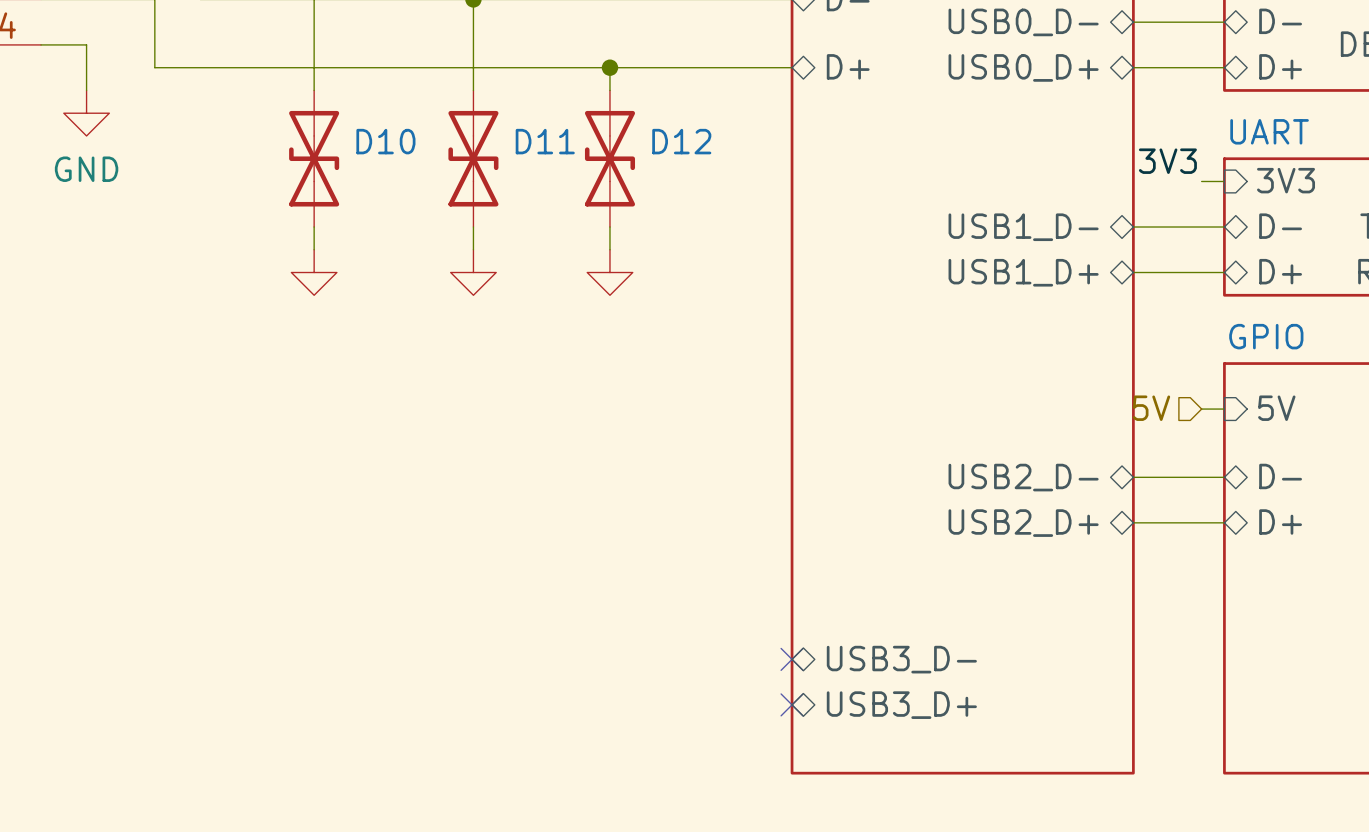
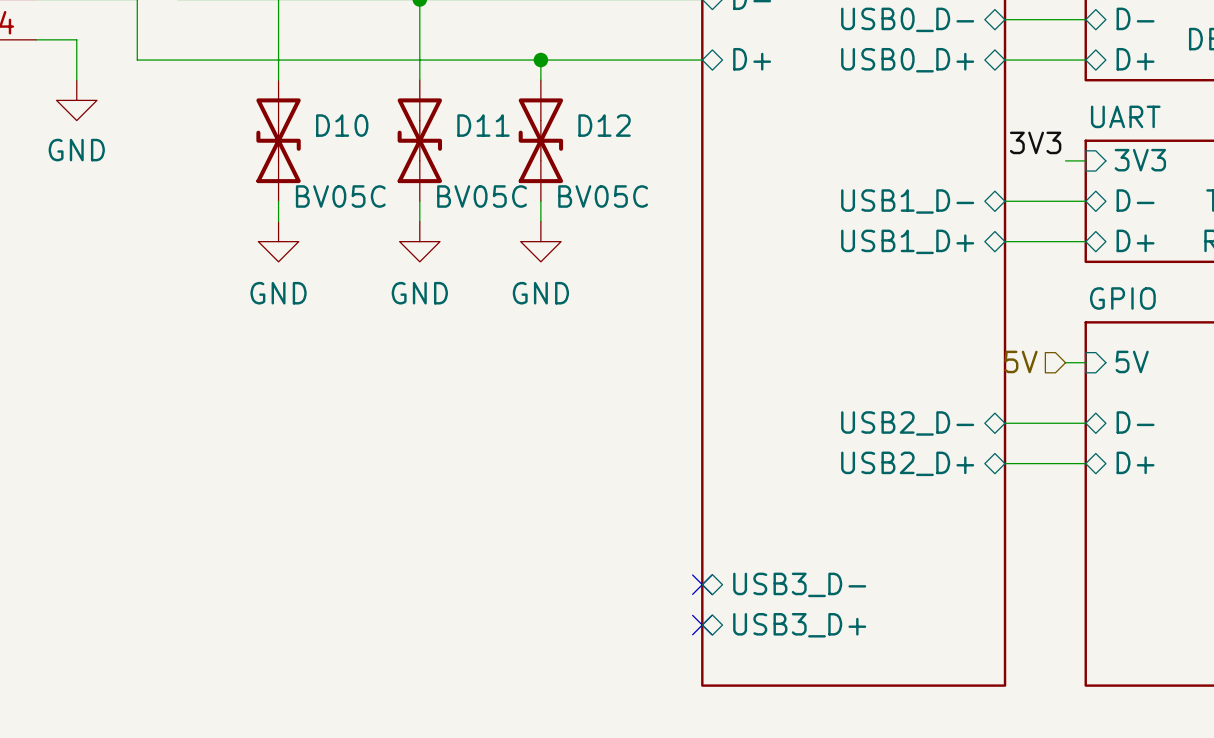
D10 value: none -> BV05C (340, 196)
D11 value: none -> BV05C (482, 196)
D12 value: none -> BV05C (603, 196)
power symbol text: none -> GND (278, 293)
power symbol text: none -> GND (419, 293)
power symbol text: none -> GND (540, 293)

